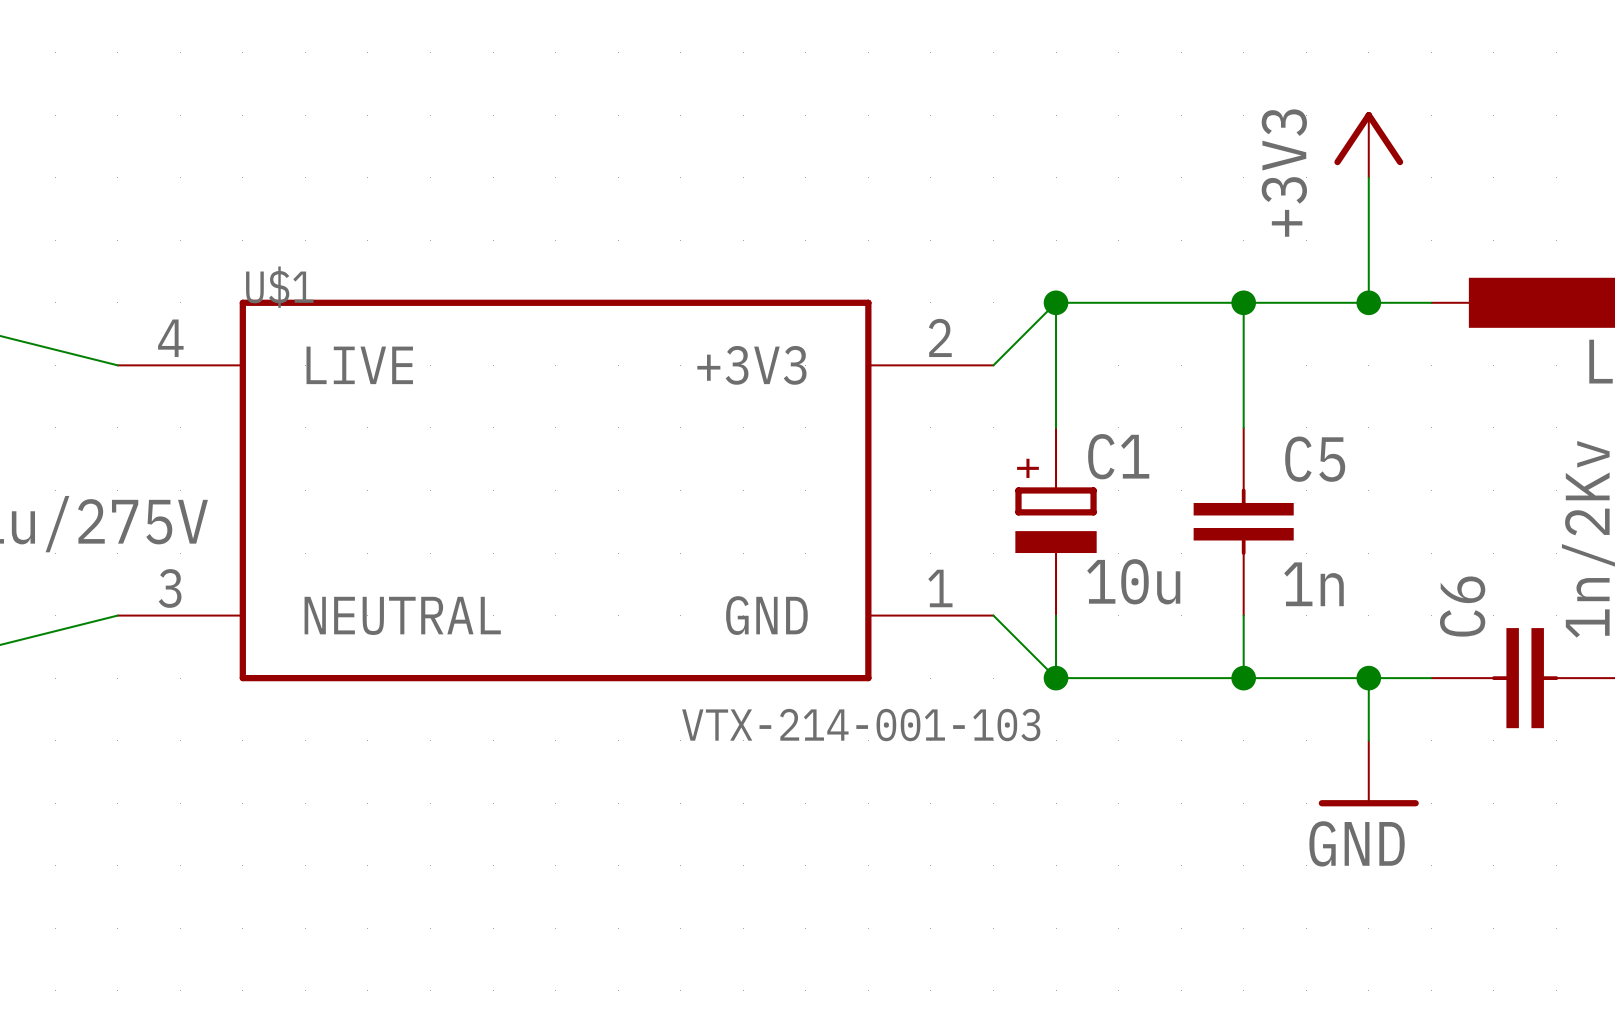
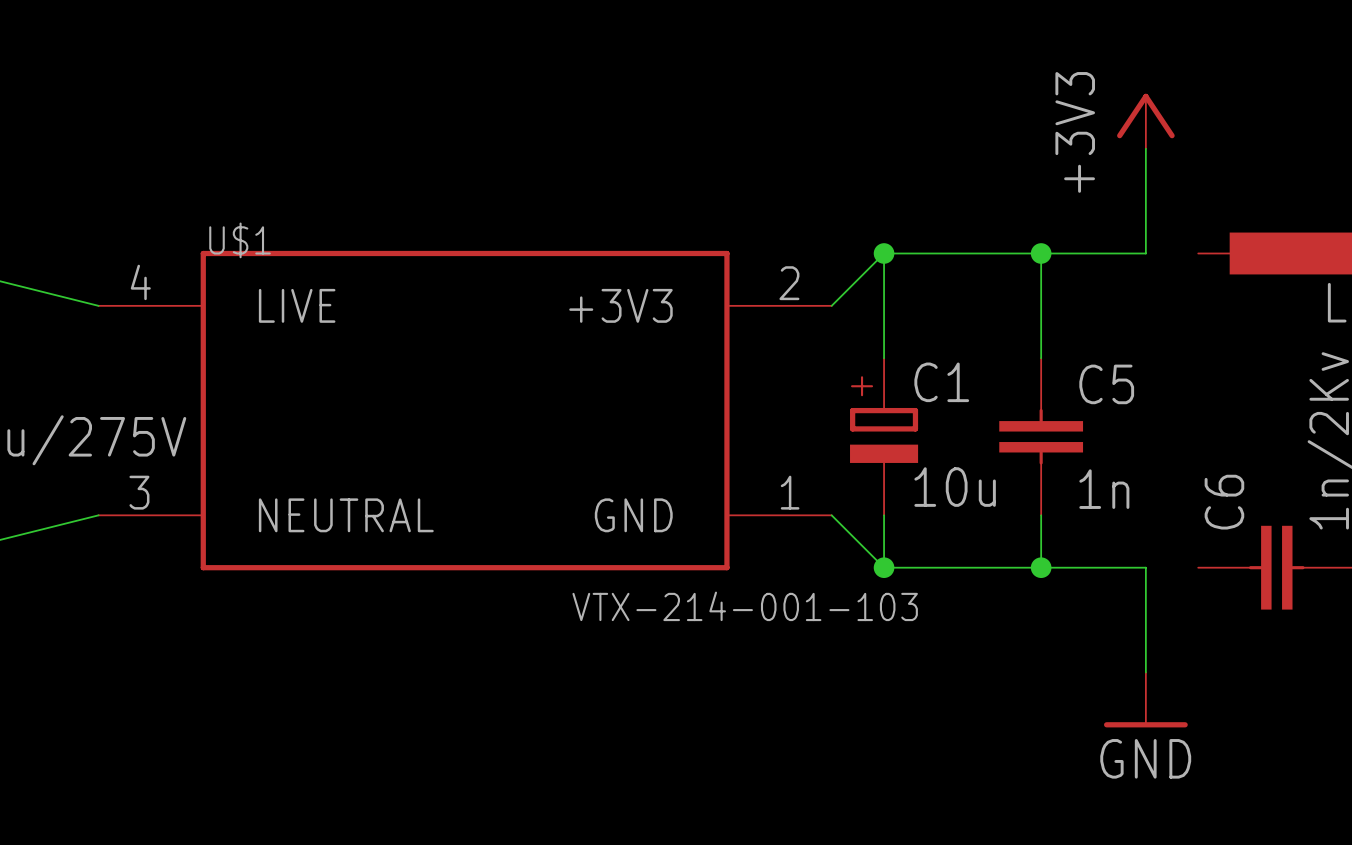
wire: (1368, 302) (1431, 302) -> none
junction: (1368, 302) -> none
wire: (1368, 678) (1431, 678) -> none
junction: (1368, 678) -> none
power symbol position: GND (1368, 773) -> GND (1145, 699)

